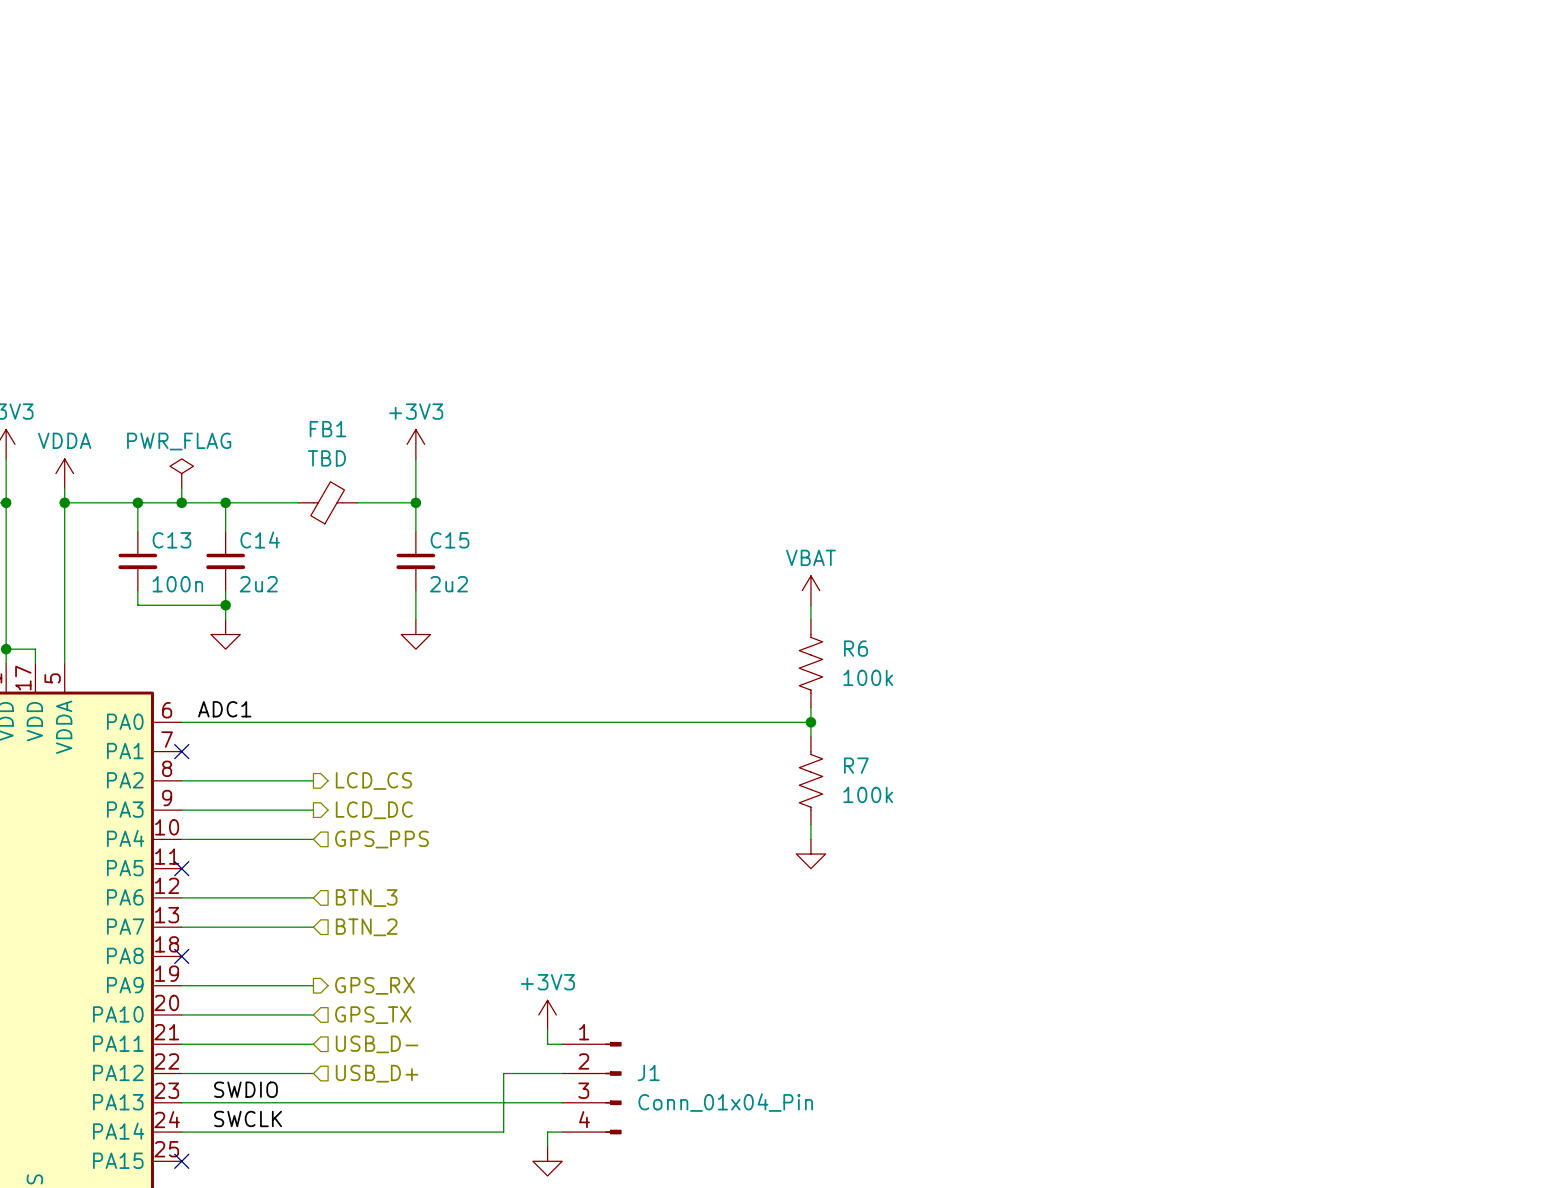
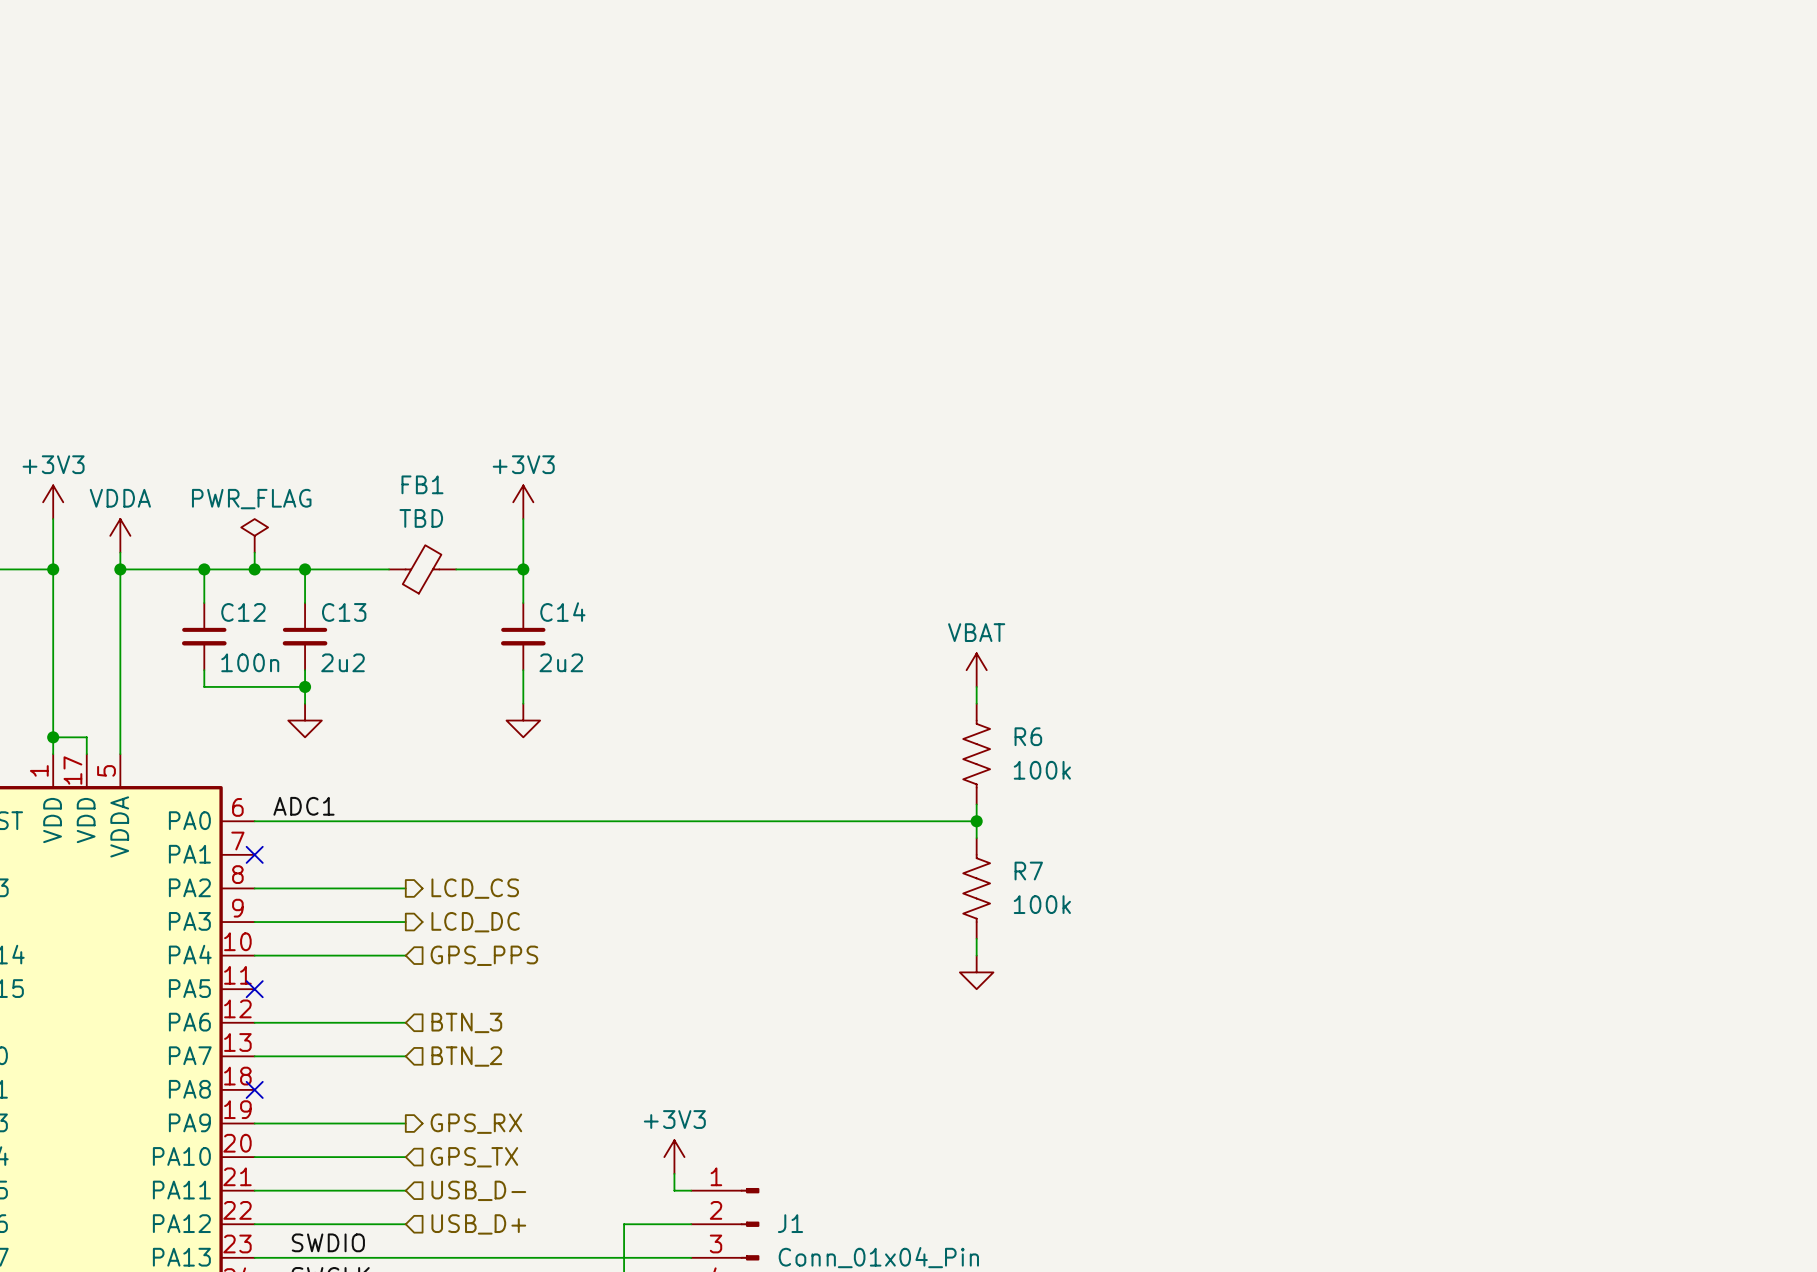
C14 name: C14 (260, 539) -> C13 (344, 612)
C13 name: C13 (171, 540) -> C12 (243, 612)
C15 name: C15 (449, 540) -> C14 (562, 612)

